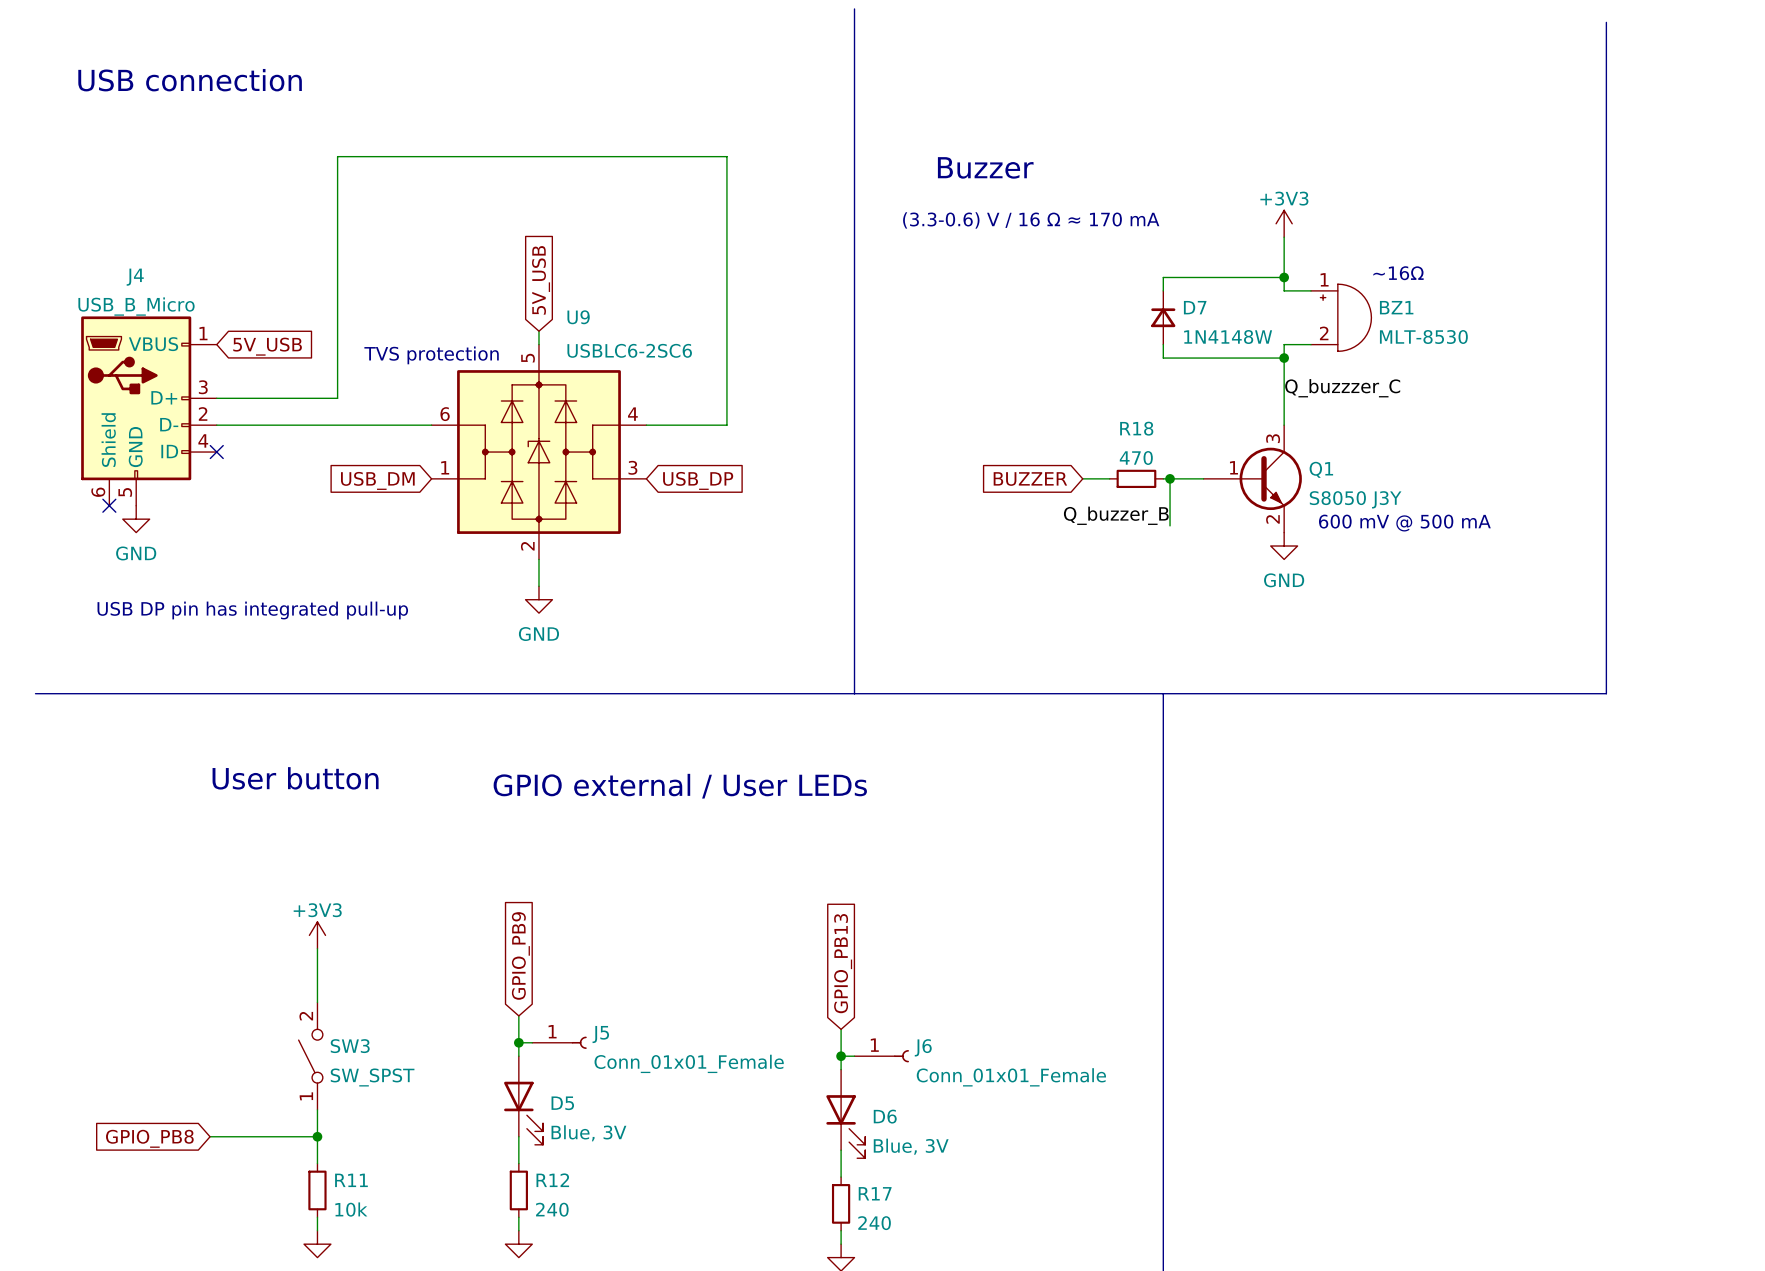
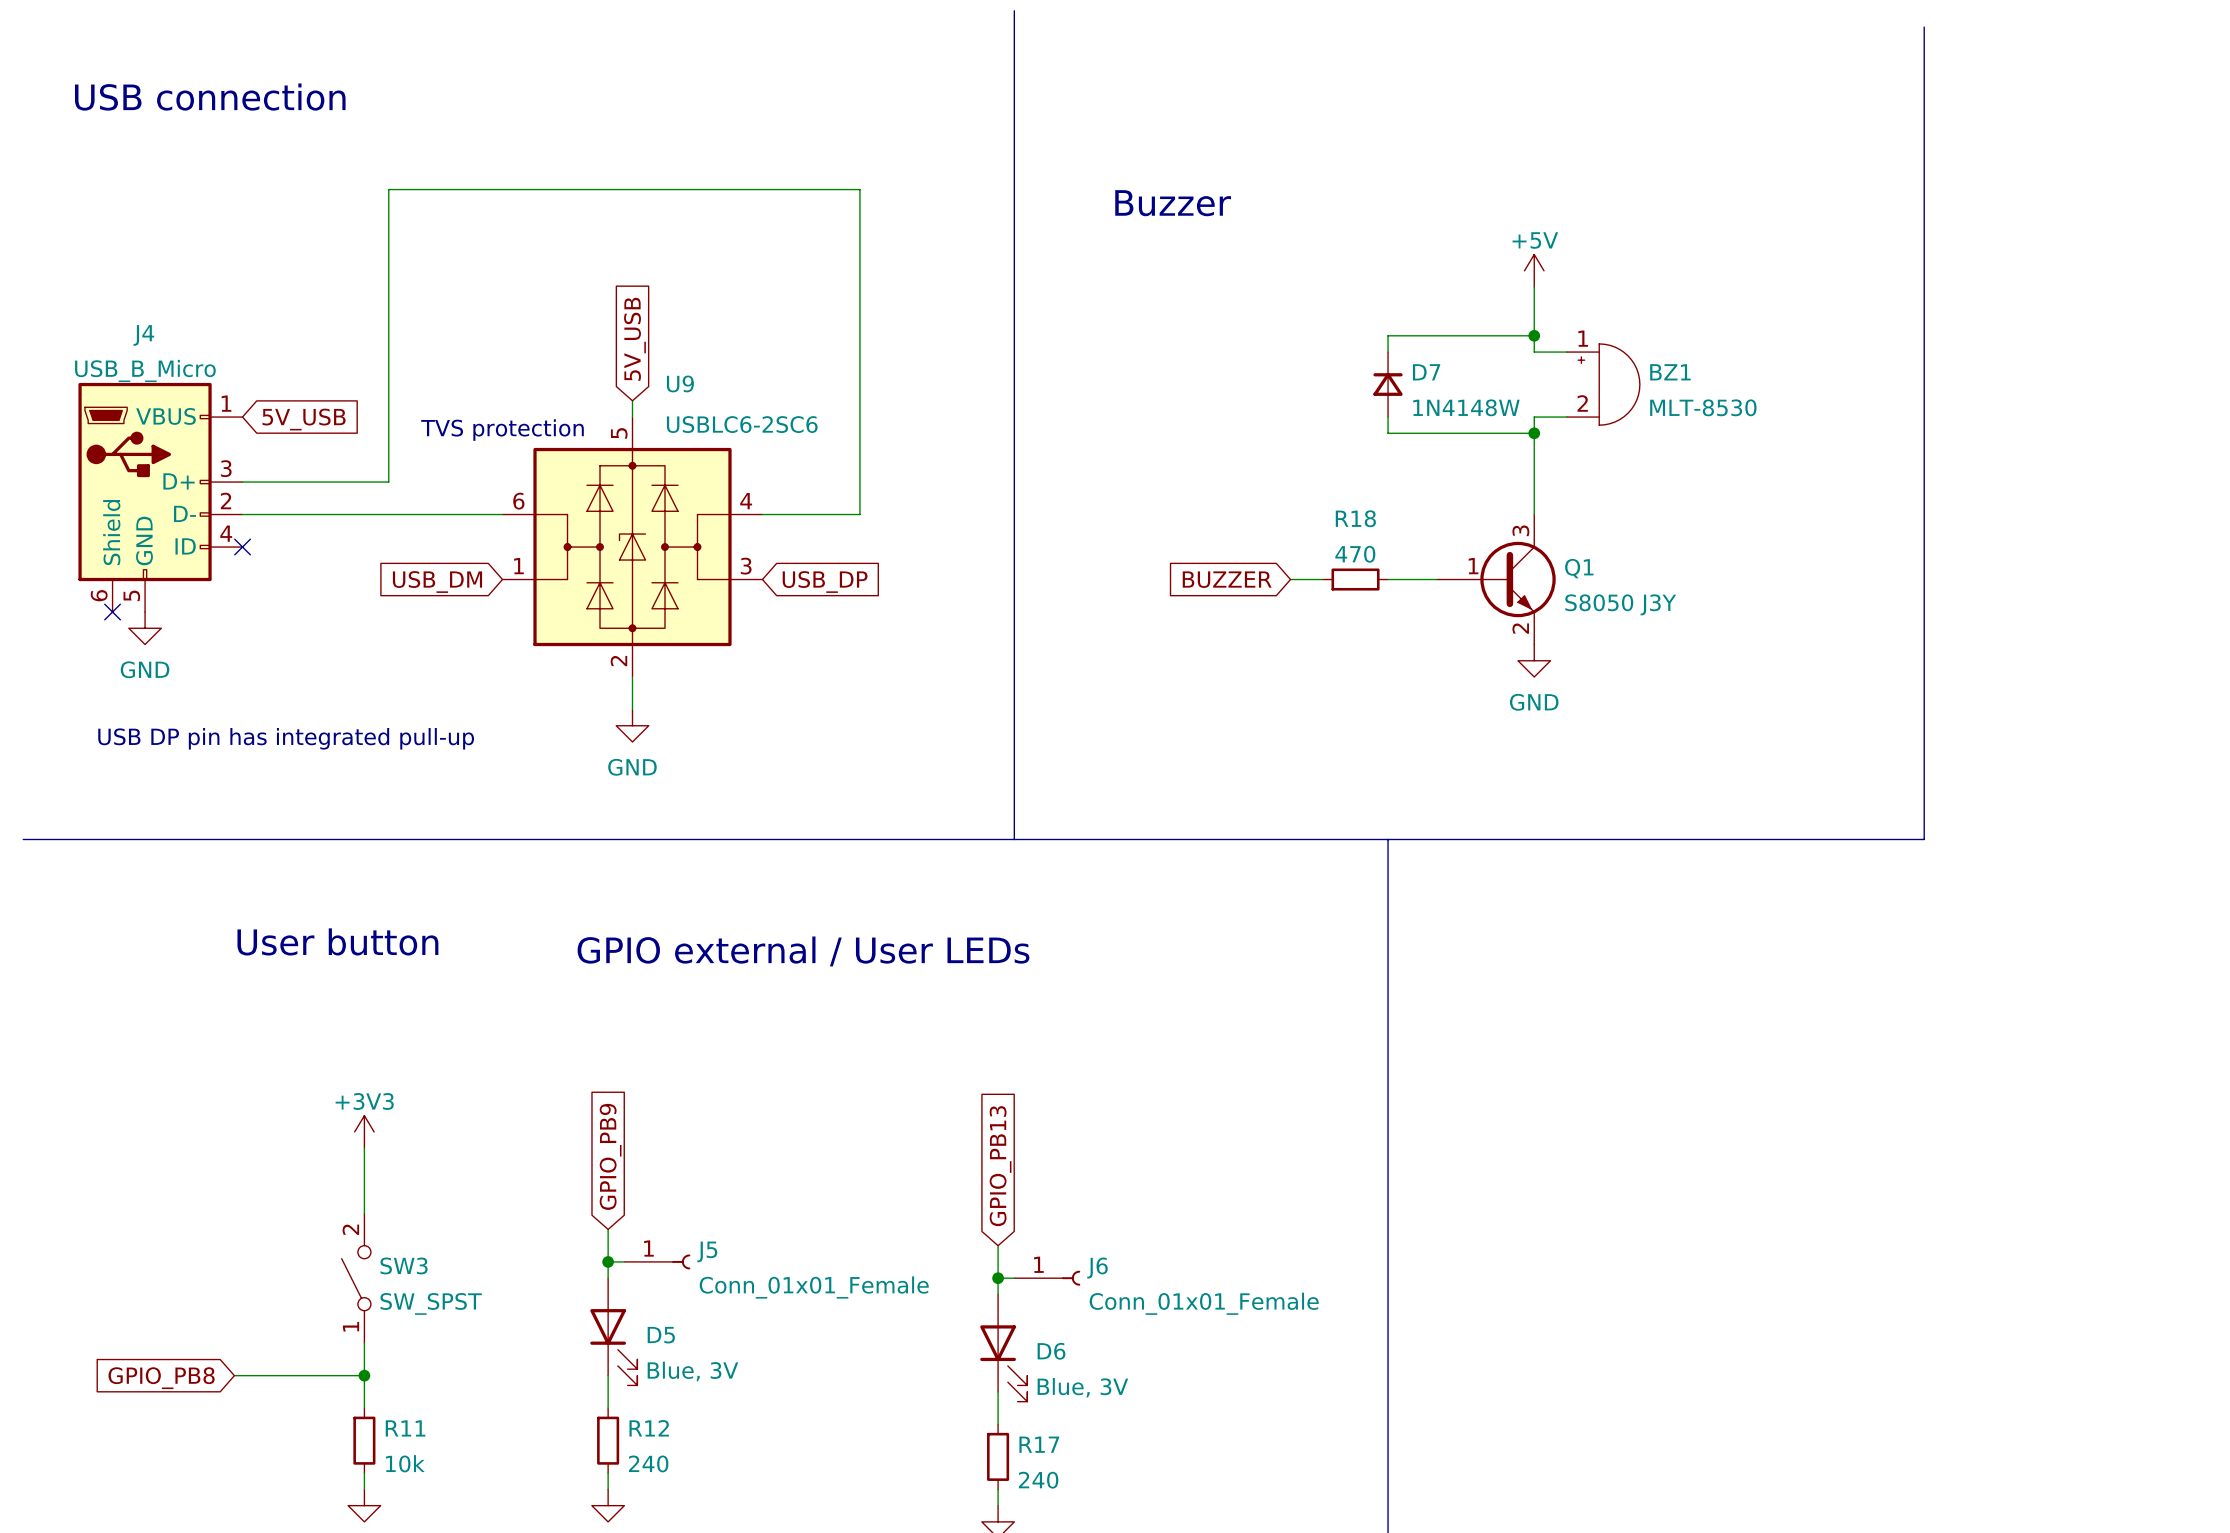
text: (3.3-0.6) V / 16 Ω ≈ 170 mA (1031, 220) -> none
power symbol: +3V3 (1284, 223) -> +5V (1534, 270)
text: ~16Ω (1398, 273) -> none
label: Q_buzzzer_C (1342, 388) -> none
wire: (1170, 478) (1170, 525) -> none
junction: (1170, 478) -> none
label: Q_buzzer_B (1116, 515) -> none
text: 600 mV @ 500 mA (1404, 523) -> none

